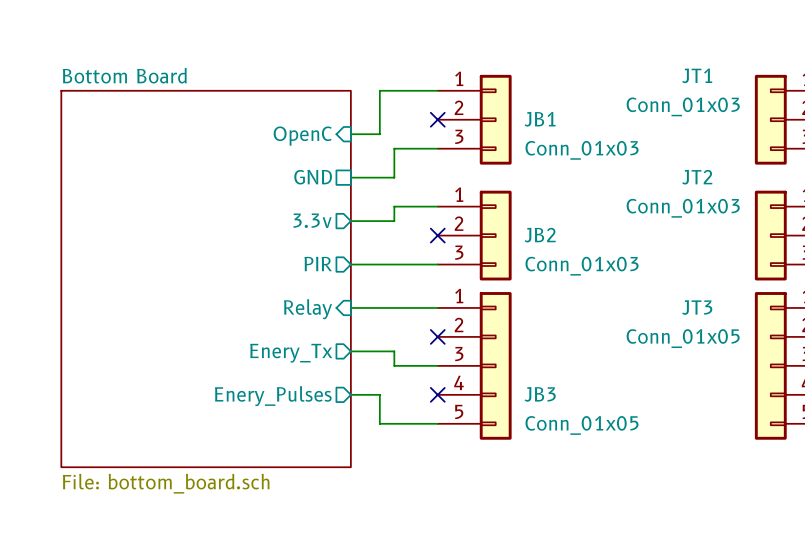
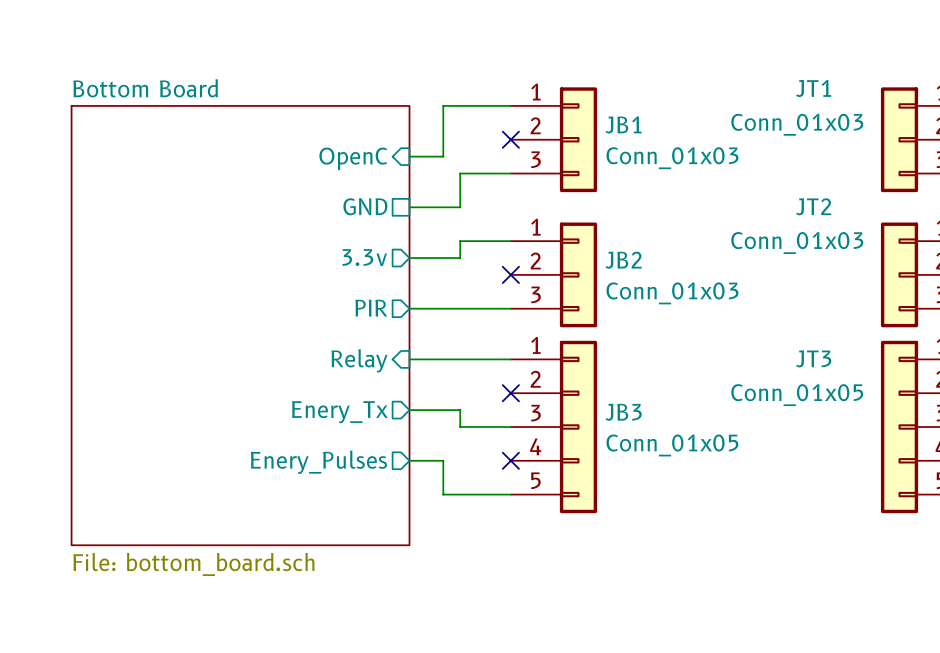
JB1 name position: JB1 (540, 119) -> JB1 (623, 125)
JB1 value position: Conn_01x03 (582, 150) -> Conn_01x03 (672, 158)
JB2 name position: JB2 (540, 235) -> JB2 (623, 260)
JB2 value position: Conn_01x03 (582, 266) -> Conn_01x03 (672, 293)
JB3 name position: JB3 (540, 394) -> JB3 (623, 412)
JB3 value position: Conn_01x05 (581, 425) -> Conn_01x05 (672, 445)

